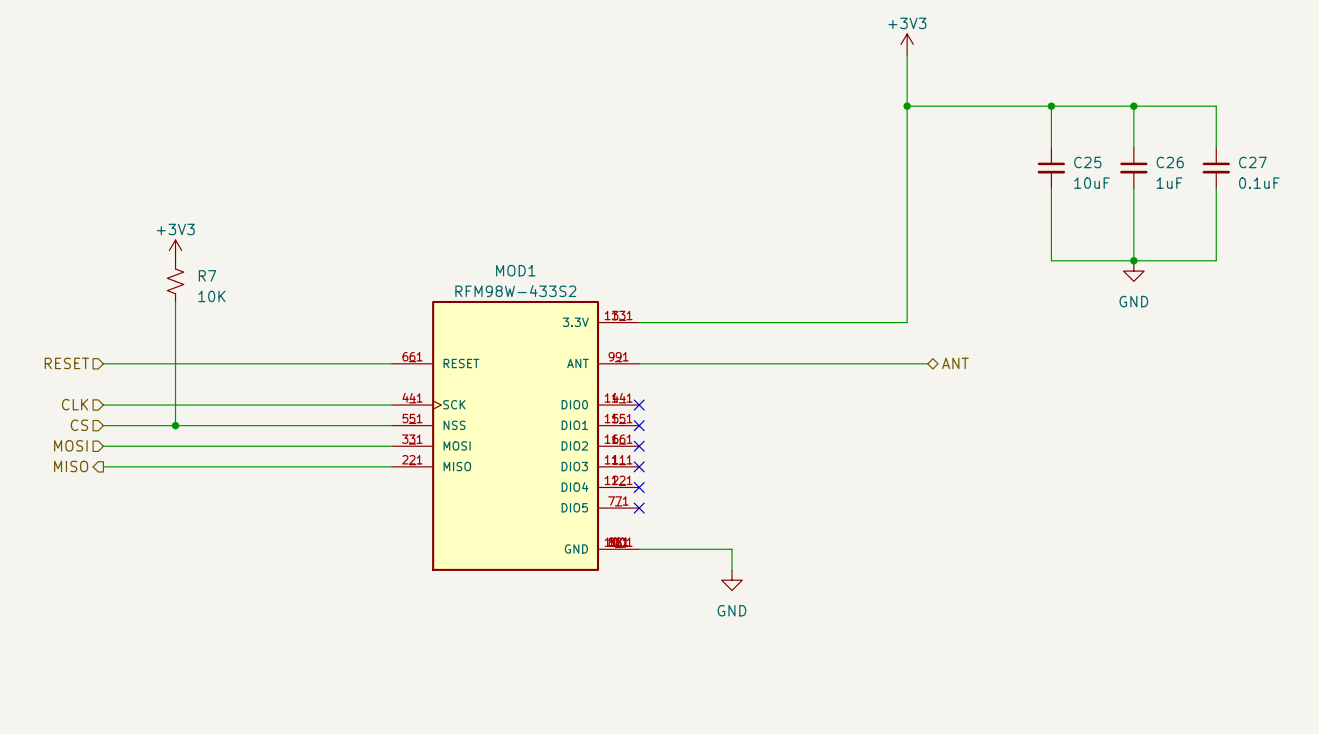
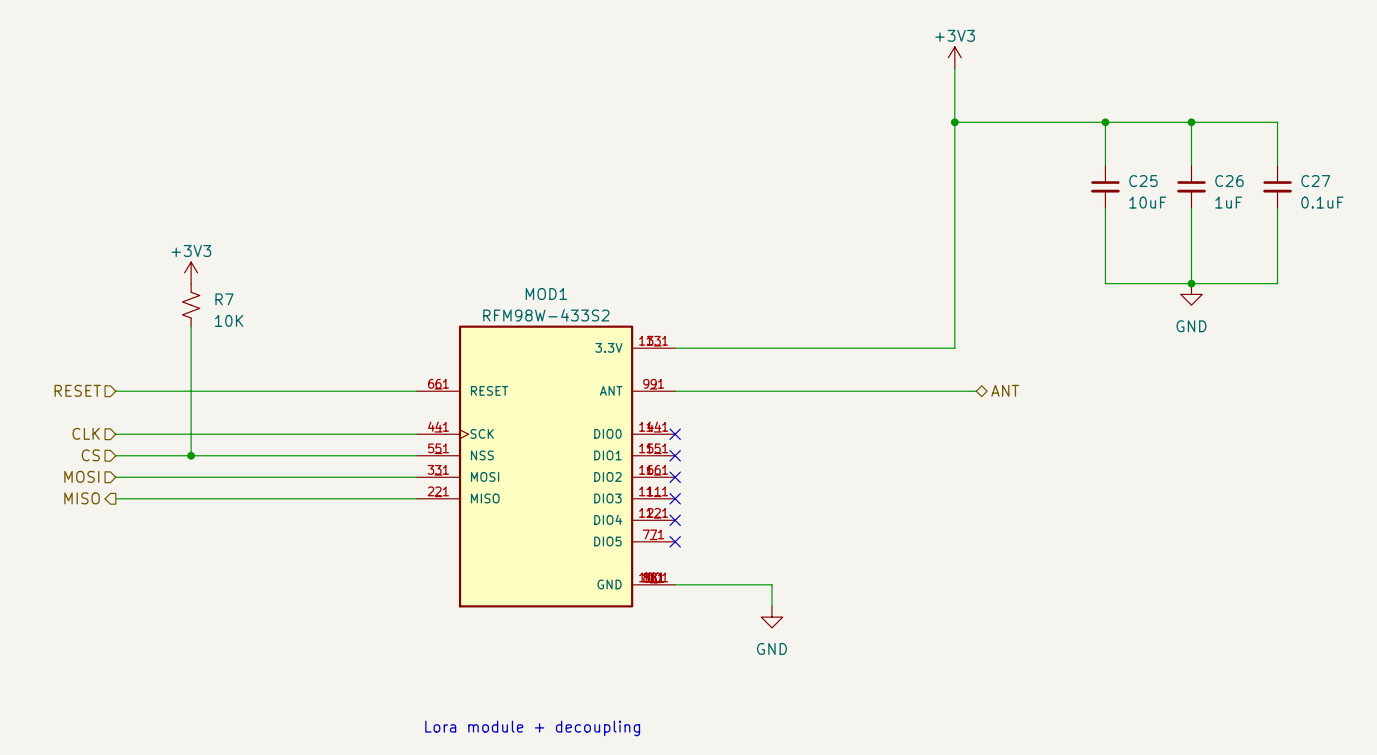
text: none -> Lora module + decoupling (532, 728)

